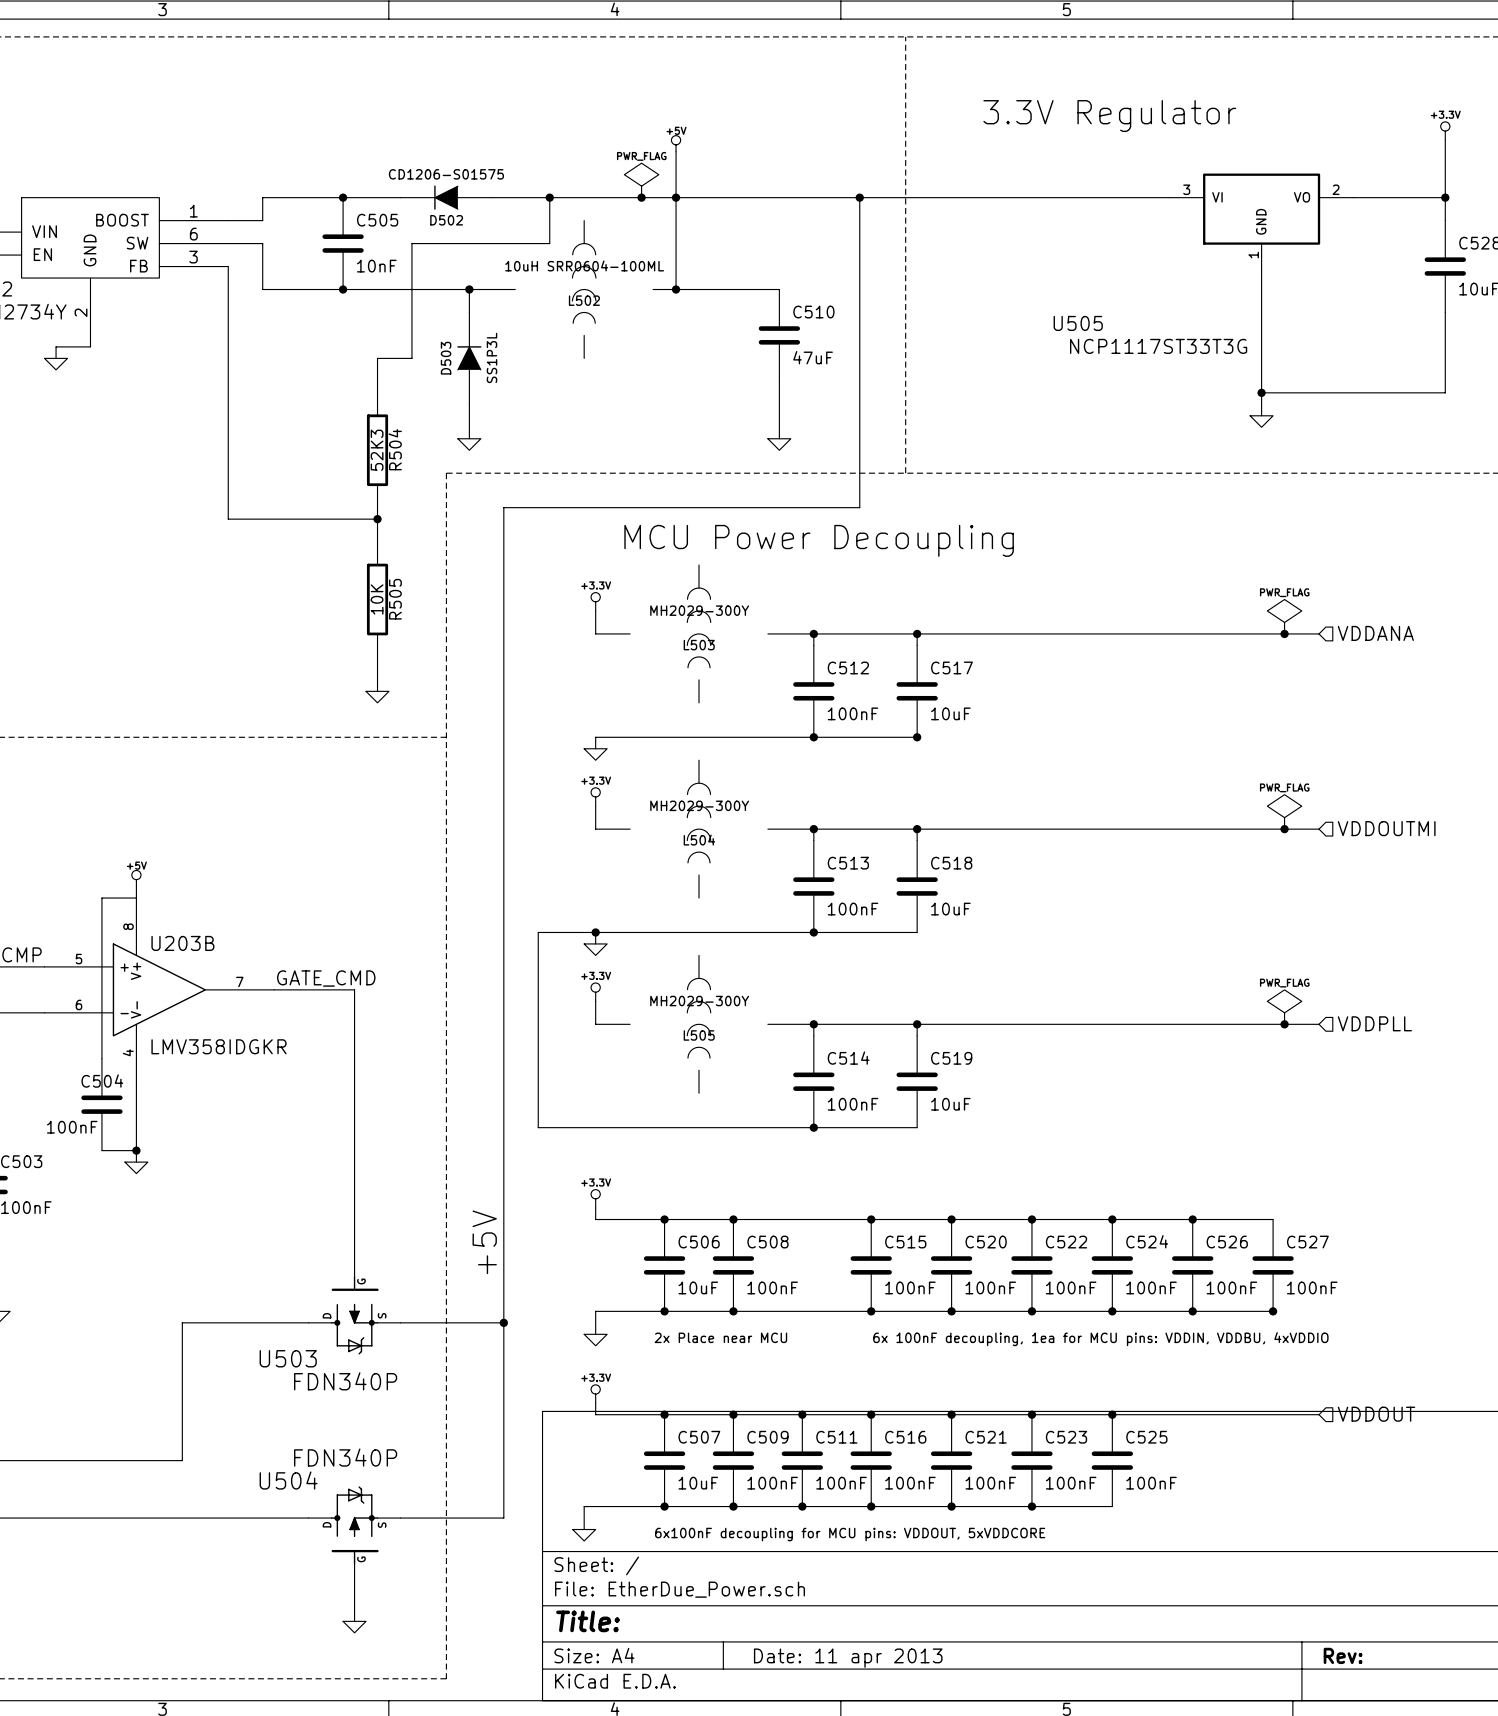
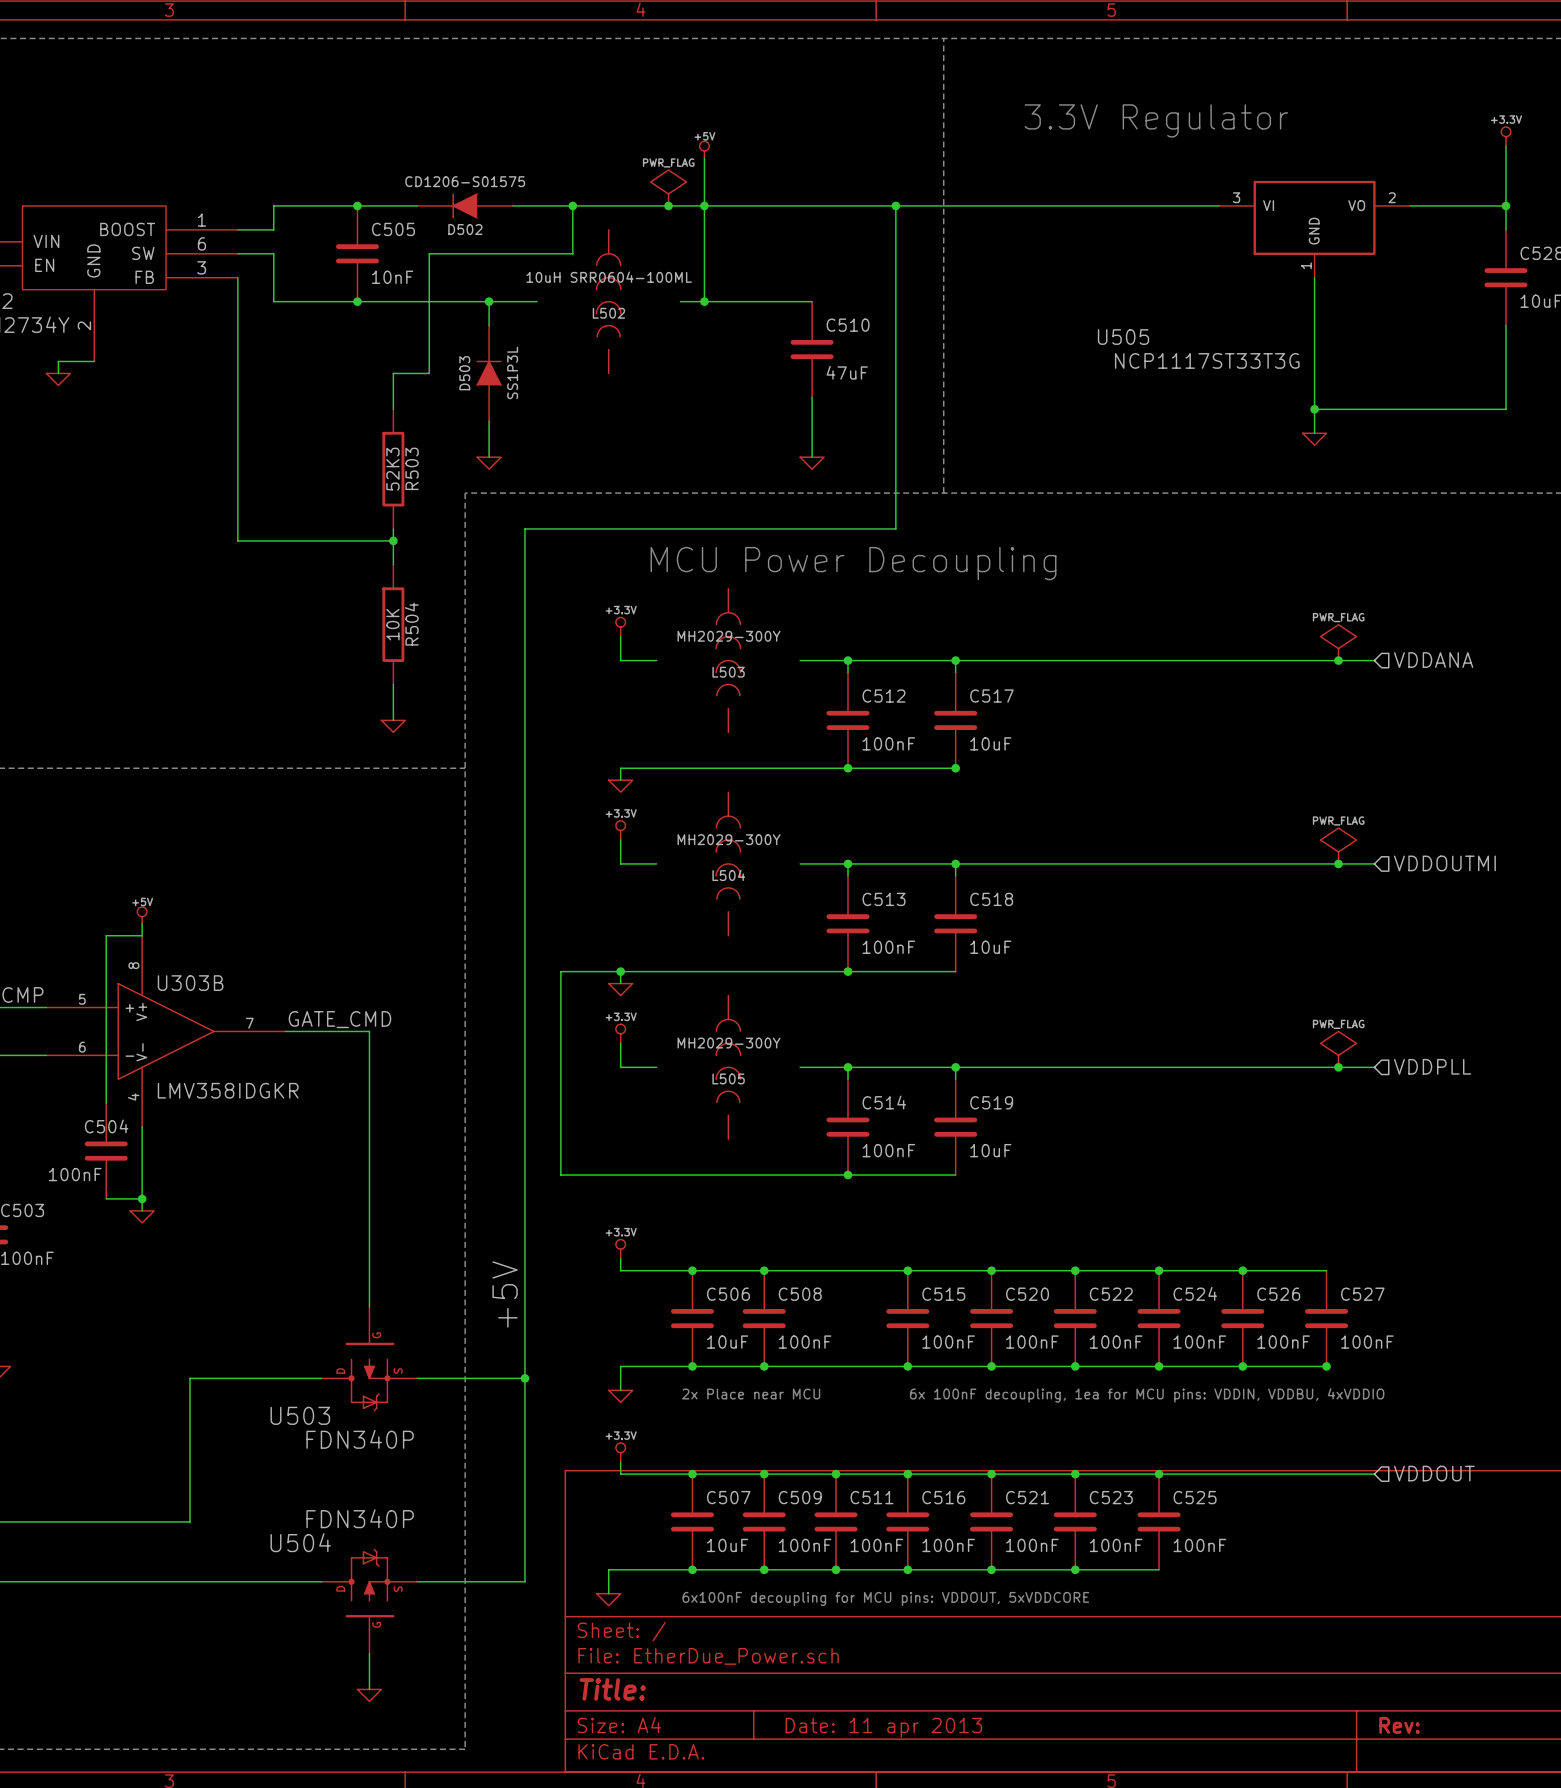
R504 name: R504 (395, 449) -> R503 (412, 468)
R505 name: R505 (395, 599) -> R504 (411, 624)
U203B name: U203B (182, 943) -> U303B (190, 983)

